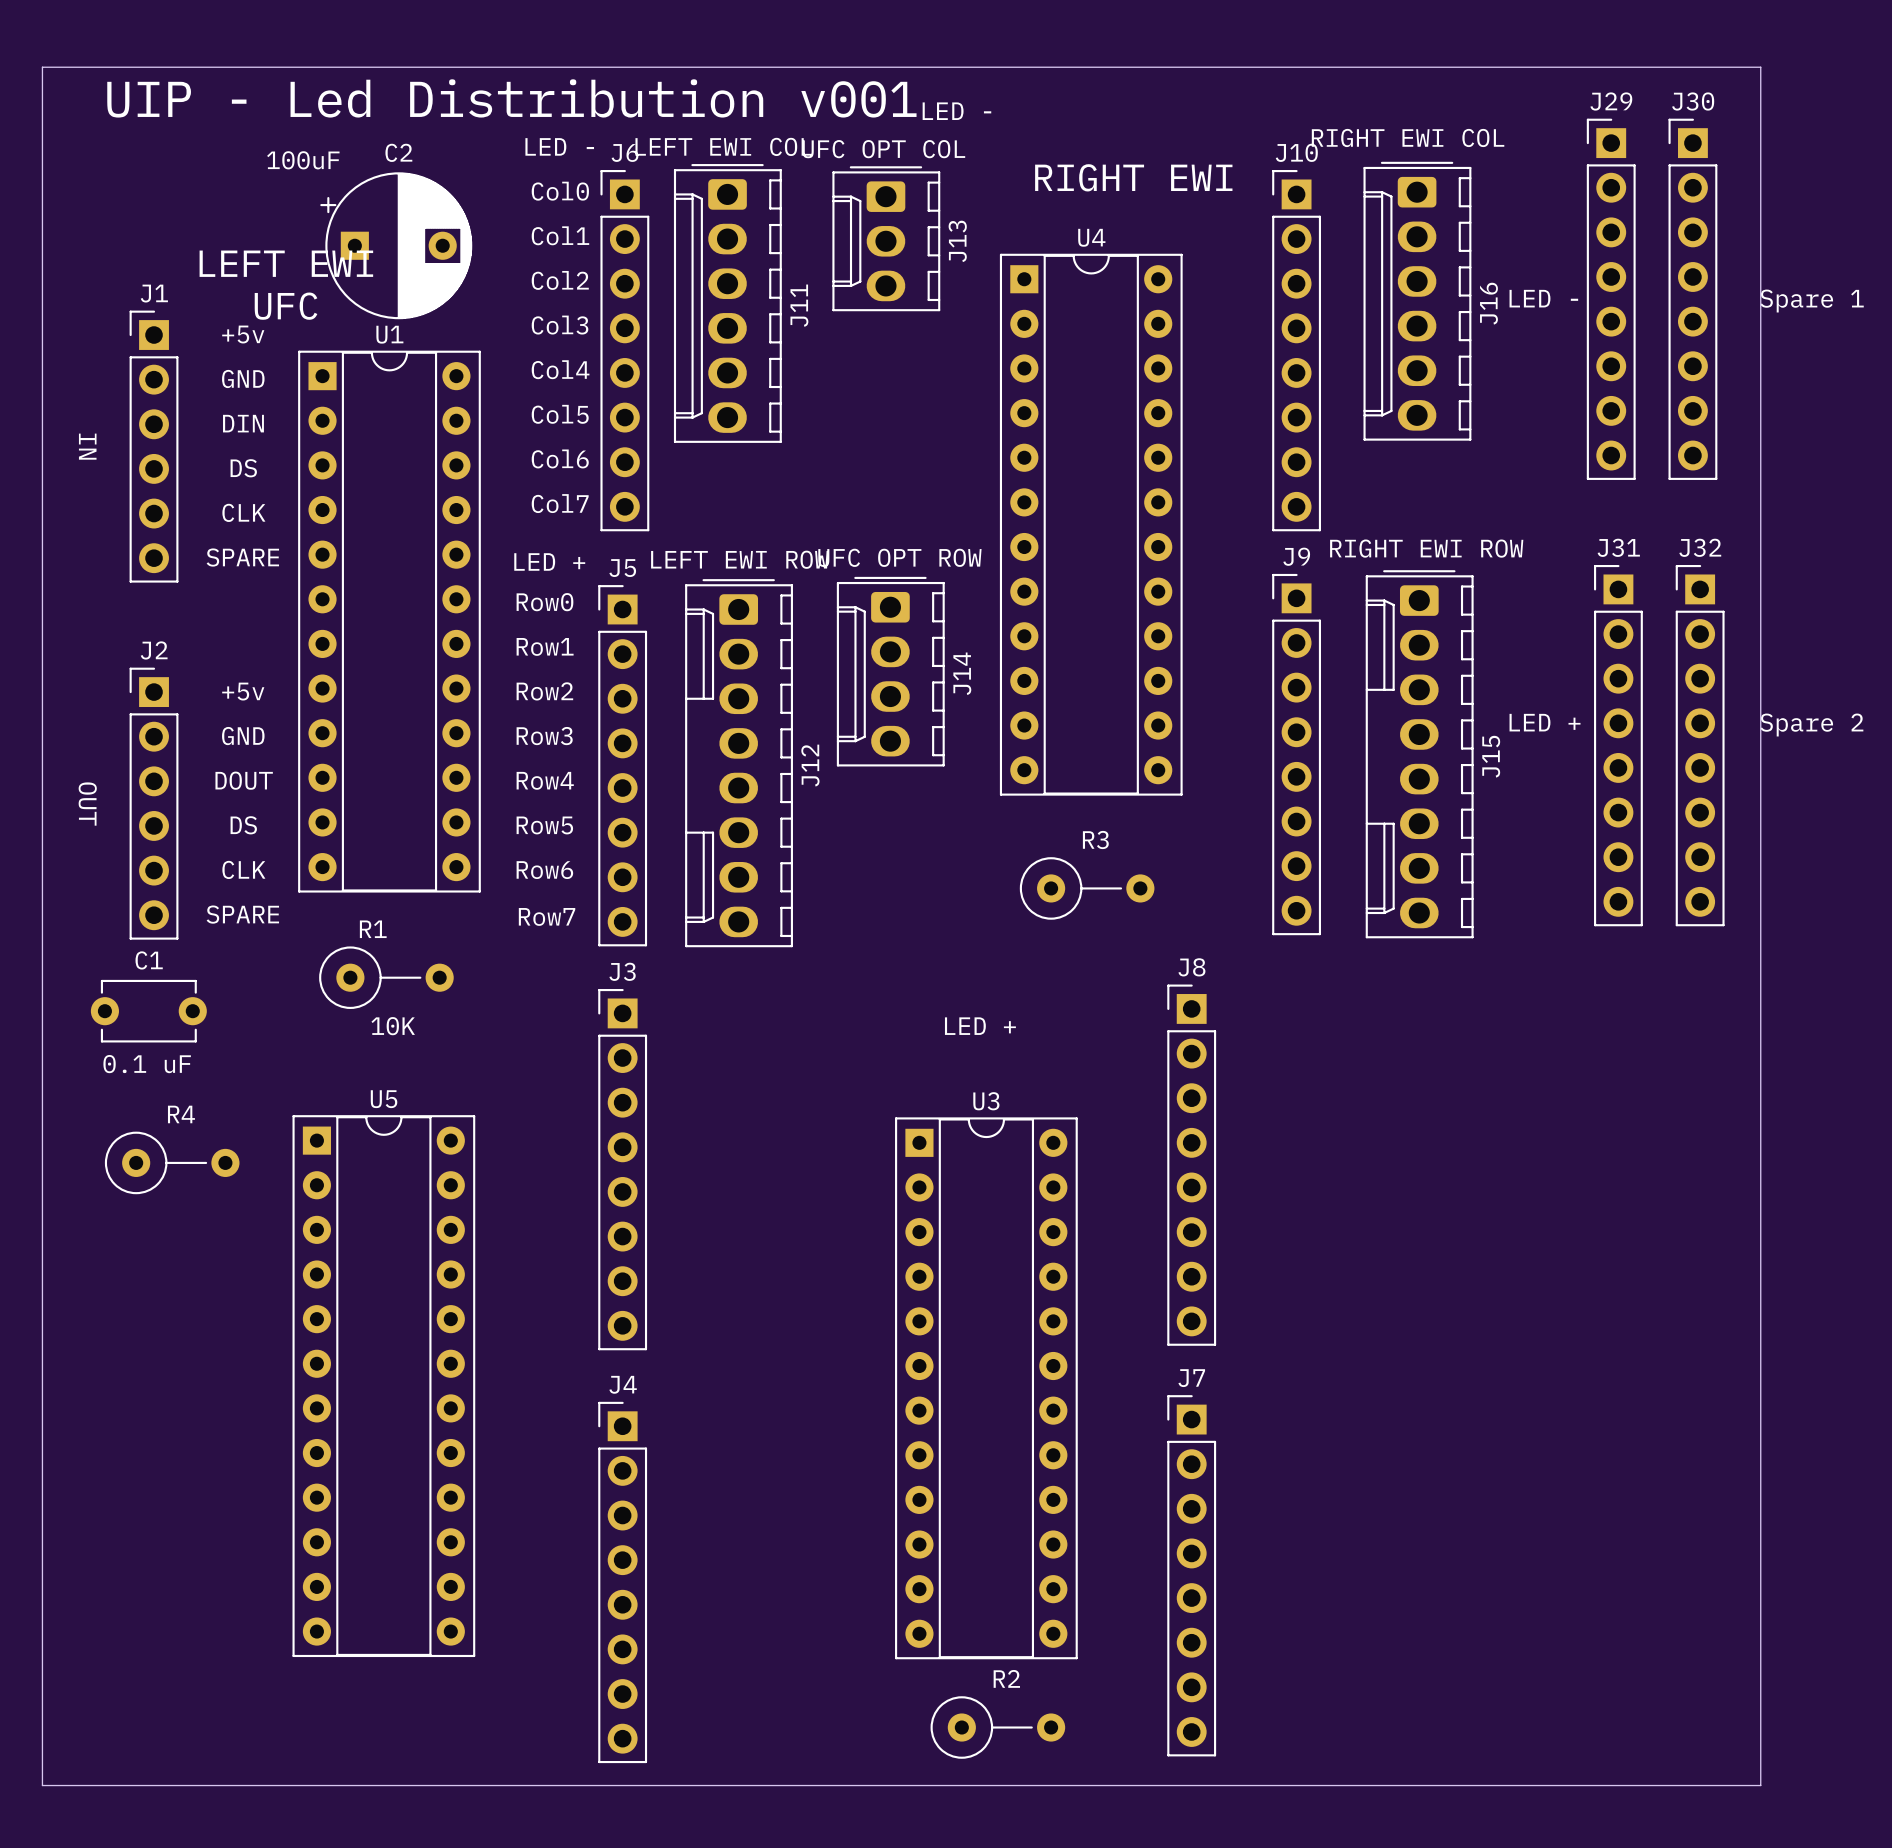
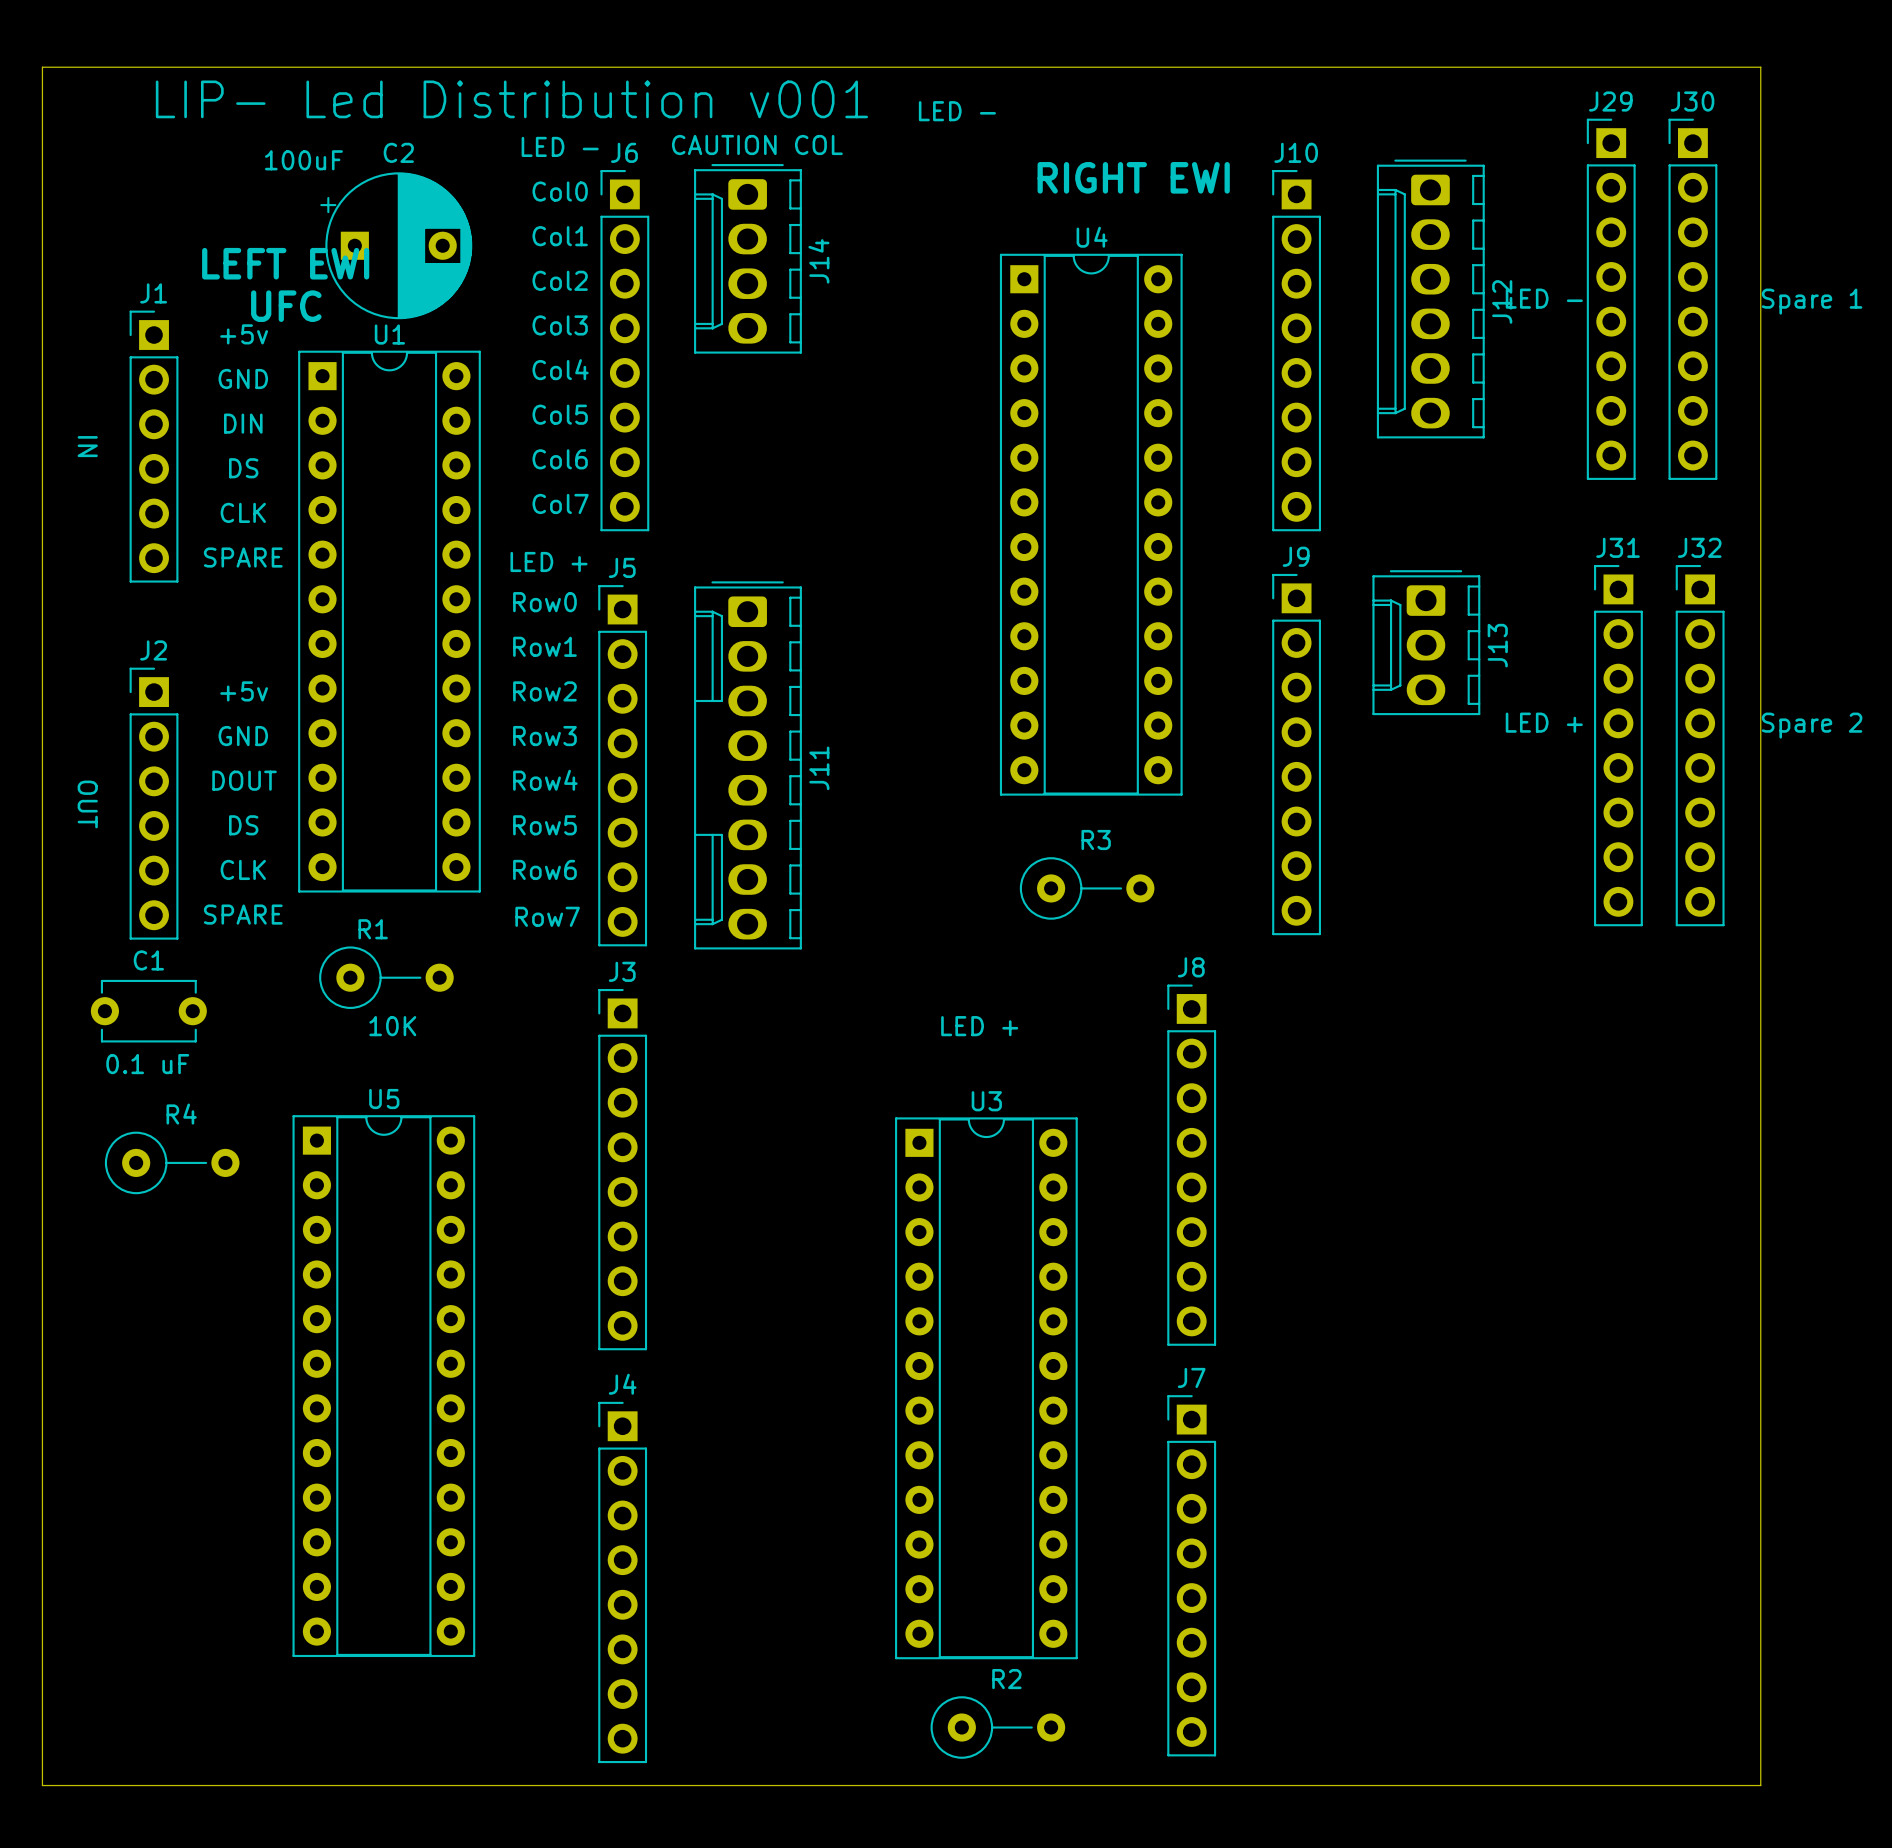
text: UIP - Led Distribution v001 (511, 98) -> LIP- Led Distribution v001 (511, 99)
J11 value: LEFT EWI COL (723, 146) -> none
J13 value: UFC OPT COL (883, 149) -> none
J11 footprint: [673, 164, 782, 443] -> [694, 581, 802, 950]
J13 position: (886, 238) -> (1426, 642)
J16: RIGHT EWI COL (1417, 301) -> none
J14 value: UFC OPT ROW (899, 557) -> CAUTION COL (757, 144)
J12 value: LEFT EWI ROW (739, 559) -> none
J12 footprint: [685, 579, 793, 948] -> [1376, 159, 1485, 439]
J14 position: (890, 671) -> (747, 258)
J15: RIGHT EWI ROW (1419, 754) -> none

